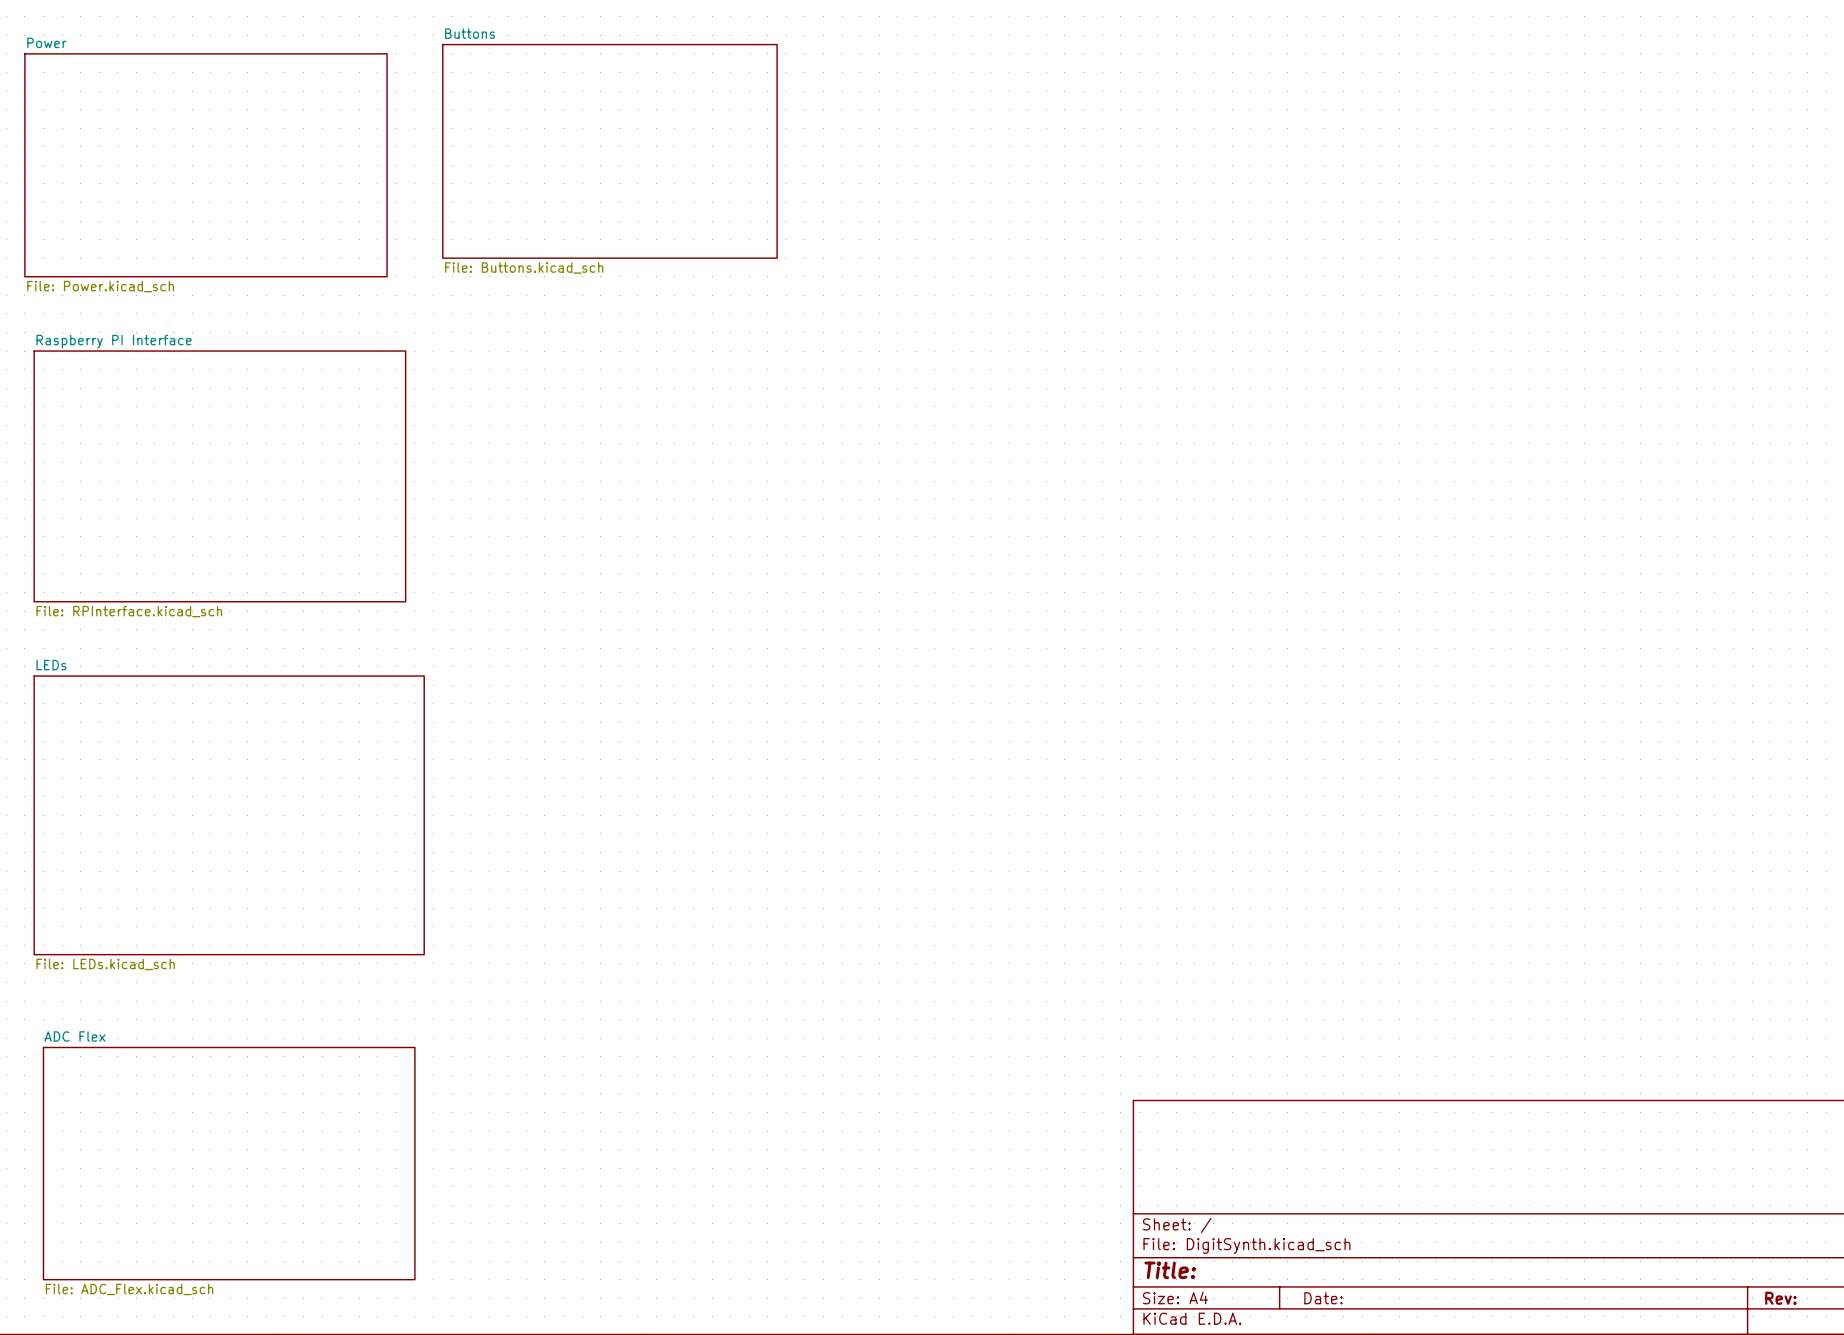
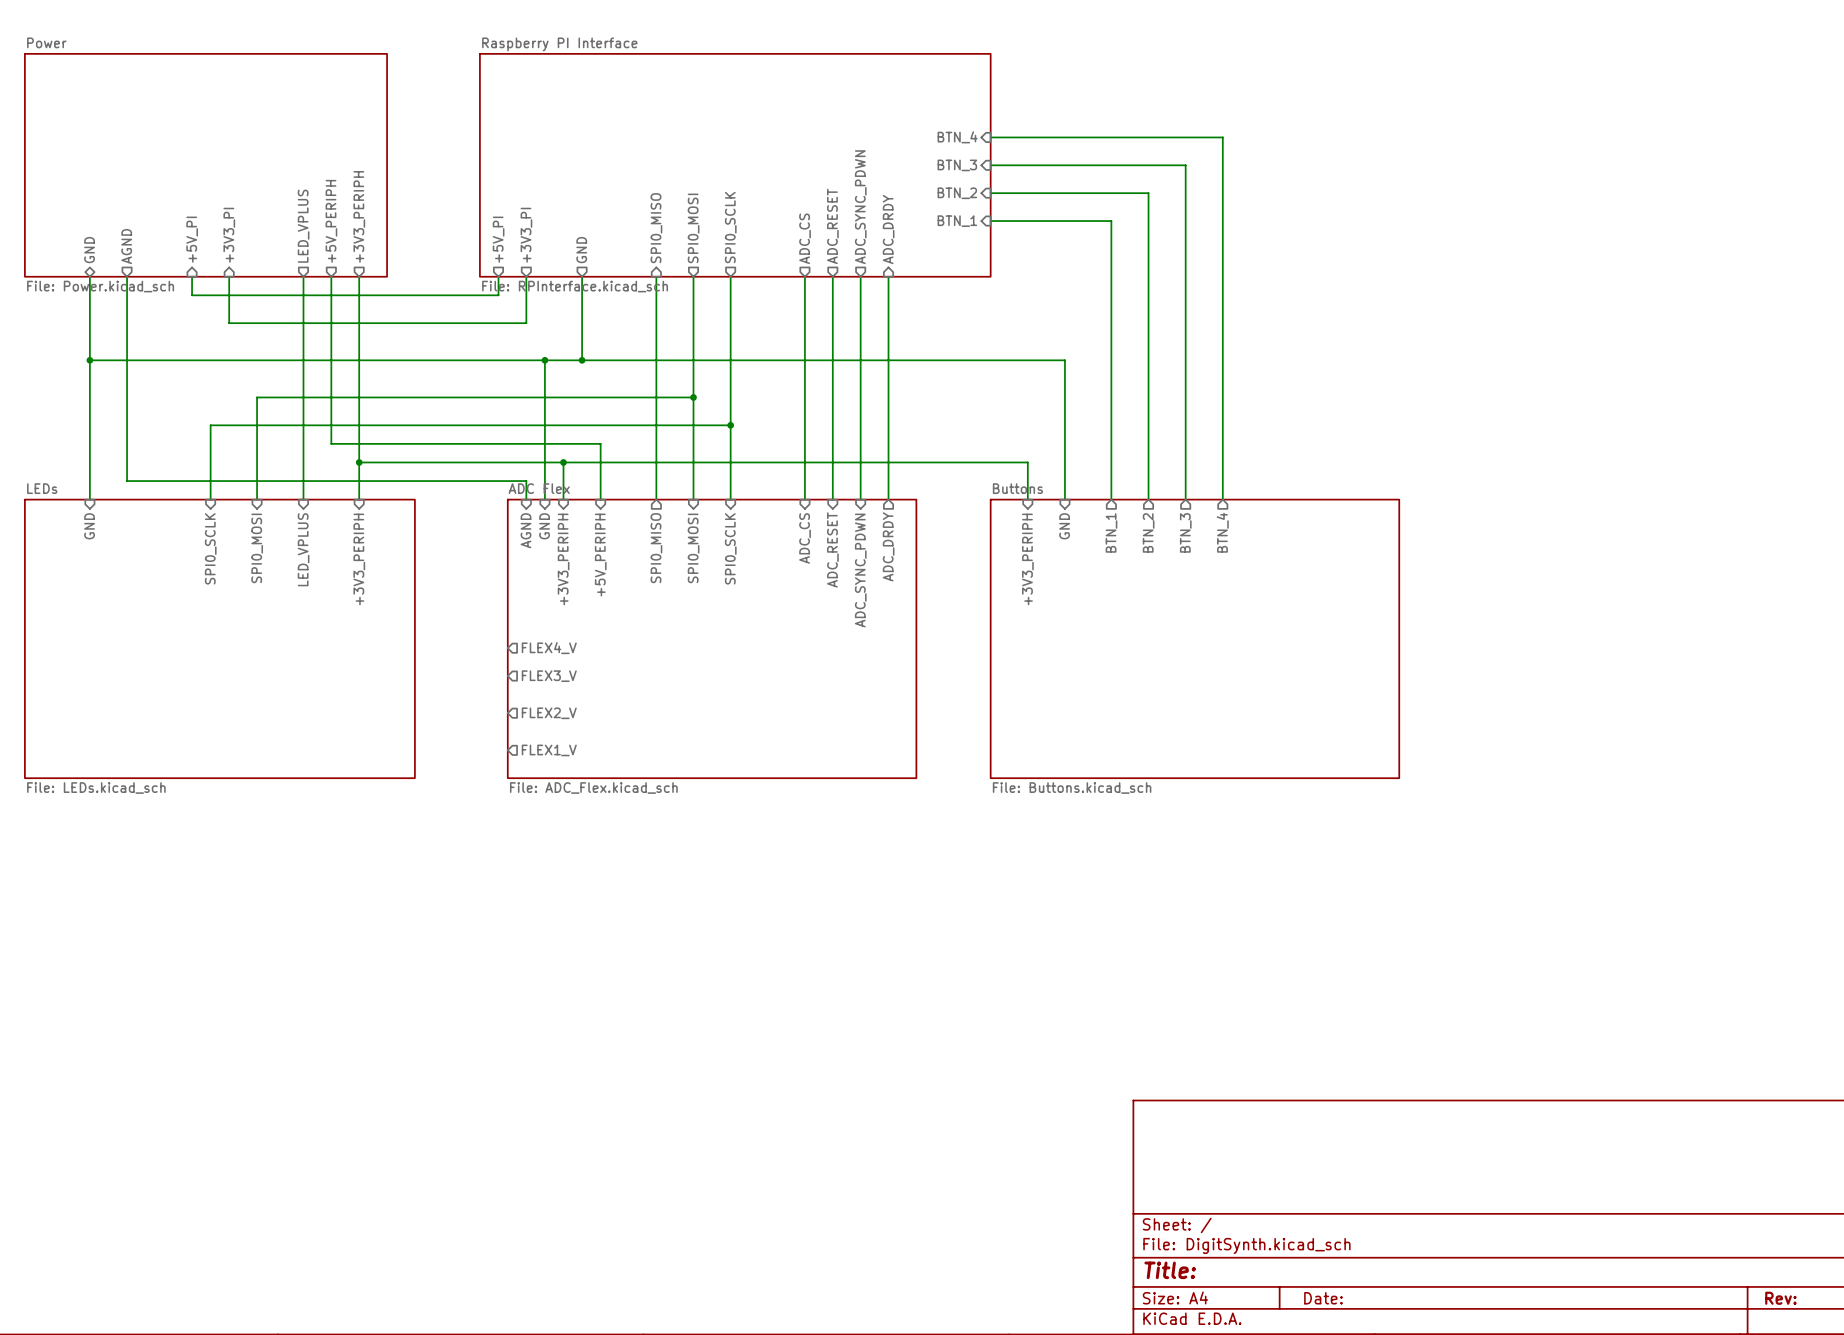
sheet pin: none -> BTN_4 (957, 137)
wire: none -> (990, 137) (1222, 137) (1222, 499)
sheet Buttons: File: Buttons.kicad_sch (609, 151) -> none
sheet Raspberry PI Interface: none -> File: RPInterface.kicad_sch (735, 165)
sheet pin: none -> BTN_3 (957, 165)
wire: none -> (990, 165) (1185, 165) (1185, 499)
sheet pin: none -> BTN_2 (957, 193)
wire: none -> (990, 193) (1148, 193) (1148, 499)
sheet pin: none -> ADC_SYNC_PDWN (860, 207)
sheet pin: none -> +3V3_PERIPH (359, 216)
sheet pin: none -> +5V_PERIPH (331, 221)
sheet pin: none -> BTN_1 (957, 221)
wire: none -> (990, 221) (1111, 221) (1111, 499)
sheet pin: none -> LED_VPLUS (303, 226)
sheet pin: none -> ADC_RESET (832, 226)
sheet pin: none -> SPI0_SCLK (730, 227)
sheet pin: none -> SPI0_MISO (656, 228)
sheet pin: none -> SPI0_MOSI (693, 228)
sheet pin: none -> ADC_DRDY (888, 229)
sheet pin: none -> +3V3_PI (229, 235)
sheet pin: none -> +3V3_PI (526, 235)
sheet pin: none -> ADC_CS (805, 238)
sheet pin: none -> +5V_PI (192, 239)
sheet pin: none -> +5V_PI (498, 239)
sheet pin: none -> AGND (126, 246)
sheet pin: none -> GND (89, 250)
sheet pin: none -> GND (581, 250)
wire: none -> (89, 276) (89, 499)
wire: none -> (127, 276) (127, 481) (526, 481) (526, 499)
wire: none -> (192, 276) (192, 295) (498, 295) (498, 276)
wire: none -> (229, 276) (229, 323) (526, 323) (526, 276)
wire: none -> (303, 276) (303, 499)
wire: none -> (331, 276) (331, 443) (600, 443) (600, 499)
wire: none -> (359, 276) (359, 499)
wire: none -> (582, 276) (582, 360)
wire: none -> (656, 276) (656, 499)
wire: none -> (693, 276) (693, 499)
wire: none -> (730, 276) (730, 499)
wire: none -> (804, 276) (804, 499)
wire: none -> (832, 276) (832, 499)
wire: none -> (860, 276) (860, 499)
wire: none -> (888, 276) (888, 499)
wire: none -> (89, 360) (1064, 360) (1064, 499)
junction: none -> (89, 360)
wire: none -> (544, 360) (544, 499)
junction: none -> (544, 360)
junction: none -> (582, 360)
wire: none -> (693, 397) (257, 397) (257, 499)
junction: none -> (693, 397)
wire: none -> (730, 425) (210, 425) (210, 499)
junction: none -> (730, 425)
wire: none -> (359, 462) (1027, 462) (1027, 499)
junction: none -> (359, 462)
wire: none -> (563, 462) (563, 499)
junction: none -> (563, 462)
sheet Raspberry PI Interface: File: RPInterface.kicad_sch (219, 476) -> none
sheet pin: none -> GND (89, 526)
sheet pin: none -> GND (544, 526)
sheet pin: none -> GND (1064, 526)
sheet pin: none -> AGND (526, 530)
sheet pin: none -> BTN_1 (1111, 532)
sheet pin: none -> BTN_2 (1148, 532)
sheet pin: none -> BTN_3 (1185, 532)
sheet pin: none -> BTN_4 (1222, 532)
sheet pin: none -> ADC_CS (805, 538)
sheet pin: none -> ADC_DRDY (888, 546)
sheet pin: none -> SPI0_SCLK (210, 548)
sheet pin: none -> SPI0_MOSI (257, 548)
sheet pin: none -> SPI0_MISO (656, 548)
sheet pin: none -> SPI0_MOSI (693, 548)
sheet pin: none -> SPI0_SCLK (730, 548)
sheet pin: none -> LED_VPLUS (303, 549)
sheet pin: none -> ADC_RESET (832, 549)
sheet pin: none -> +5V_PERIPH (600, 555)
sheet pin: none -> +3V3_PERIPH (359, 559)
sheet pin: none -> +3V3_PERIPH (563, 559)
sheet pin: none -> +3V3_PERIPH (1027, 559)
sheet pin: none -> ADC_SYNC_PDWN (860, 570)
sheet ADC Flex: none -> File: ADC_Flex.kicad_sch (712, 638)
sheet Buttons: none -> File: Buttons.kicad_sch (1194, 638)
sheet pin: none -> FLEX4_V (549, 648)
sheet pin: none -> FLEX3_V (549, 676)
sheet pin: none -> FLEX2_V (549, 713)
sheet pin: none -> FLEX1_V (549, 750)
sheet LEDs position: (229, 815) -> (219, 638)
sheet ADC Flex: File: ADC_Flex.kicad_sch (229, 1163) -> none

